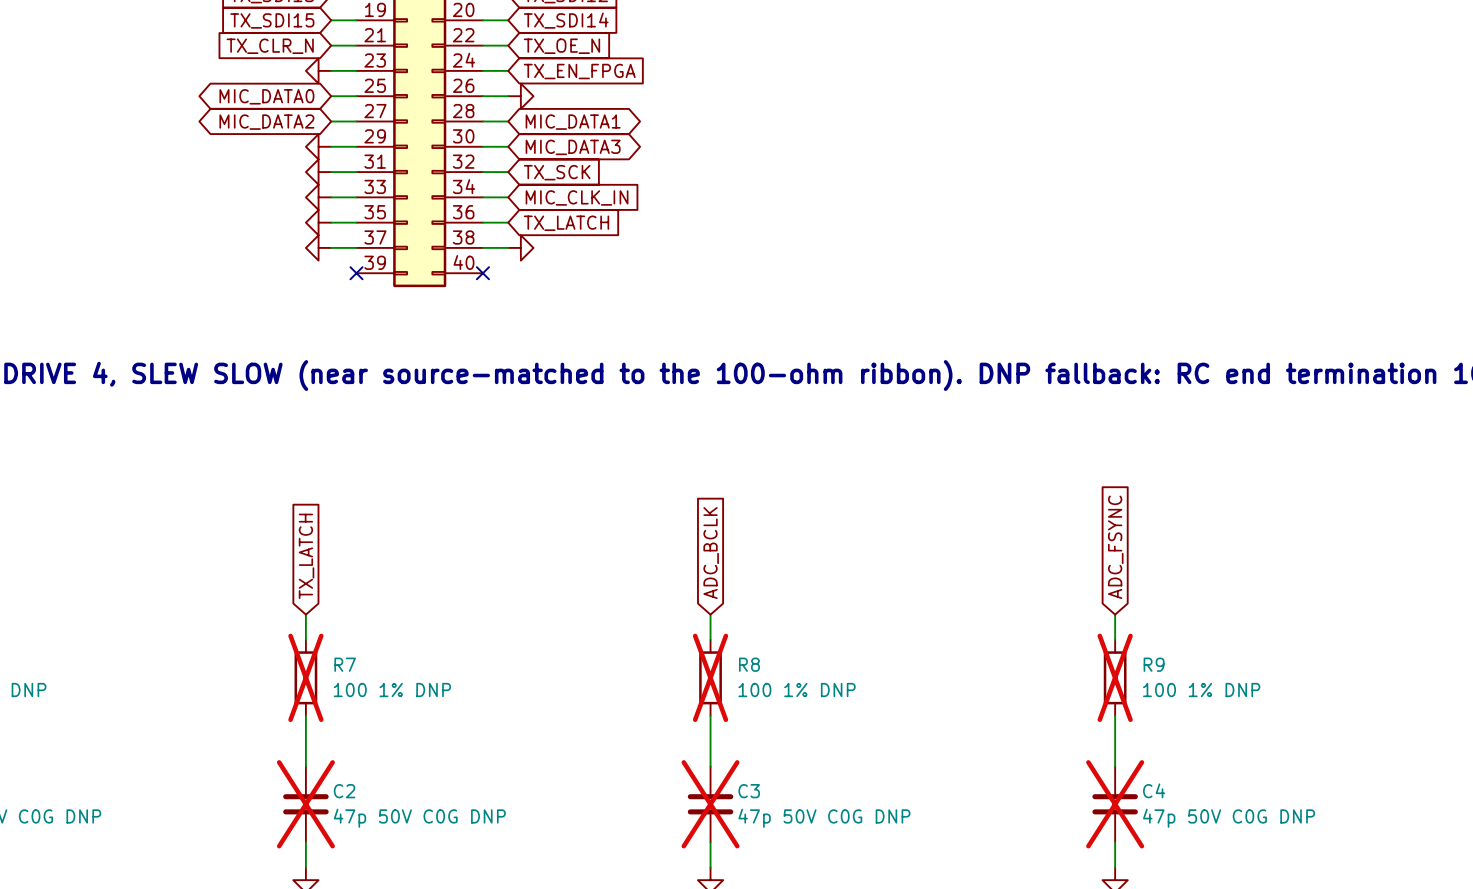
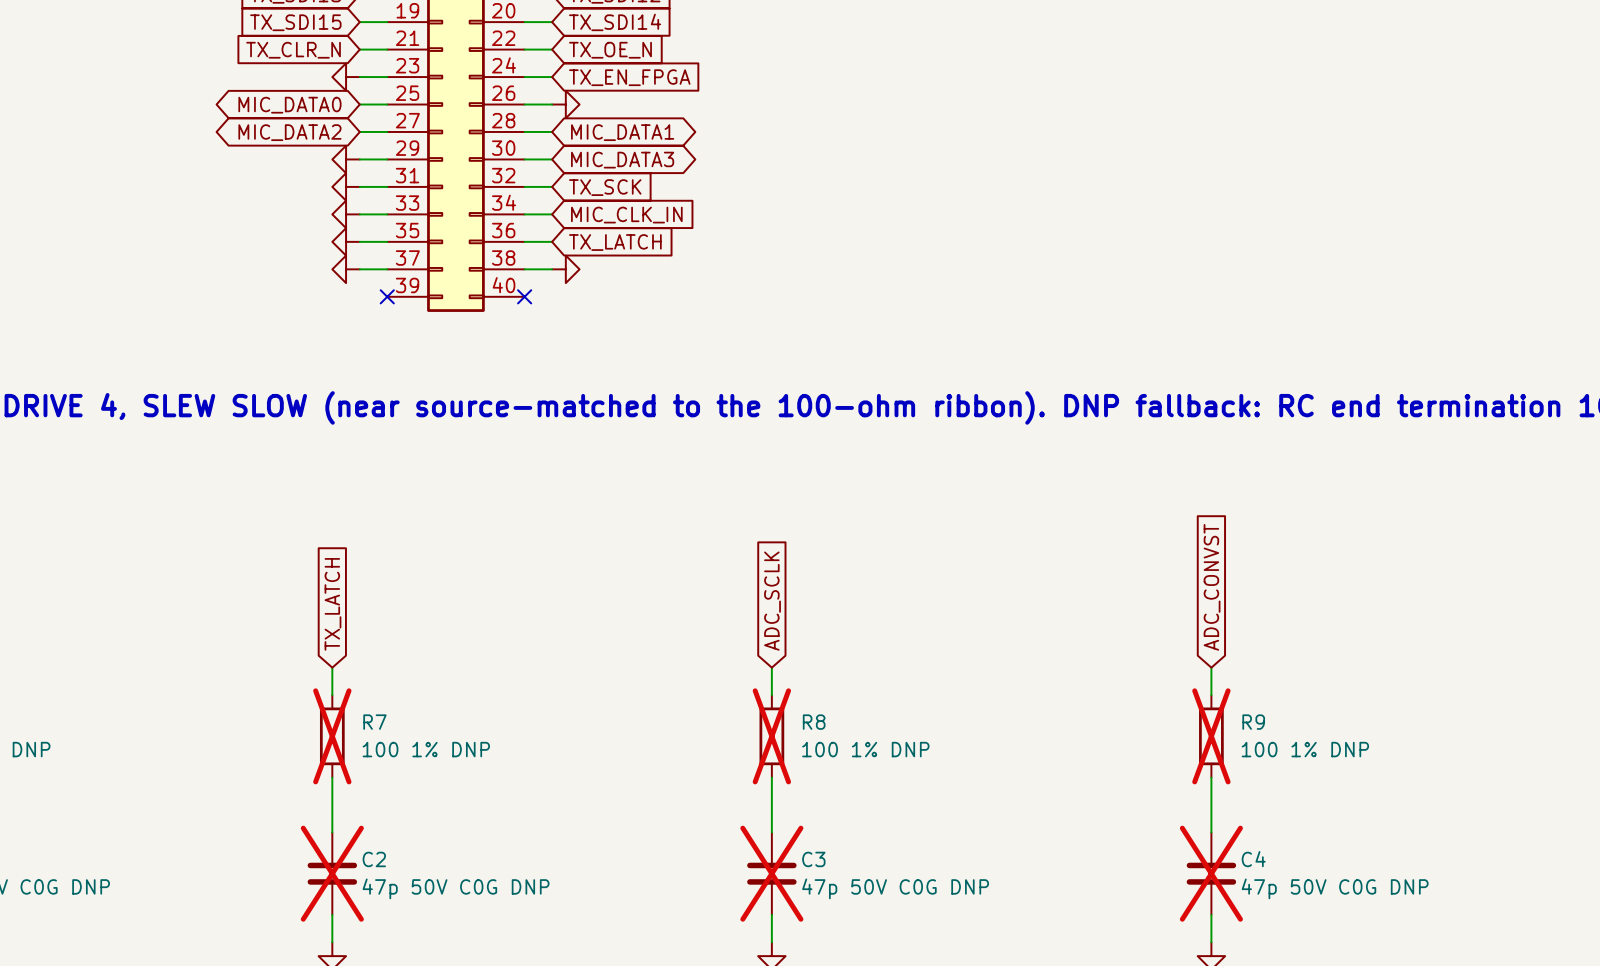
global label: ADC_FSYNC (1115, 547) -> ADC_CONVST (1212, 587)
global label: ADC_BCLK (711, 553) -> ADC_SCLK (772, 601)

